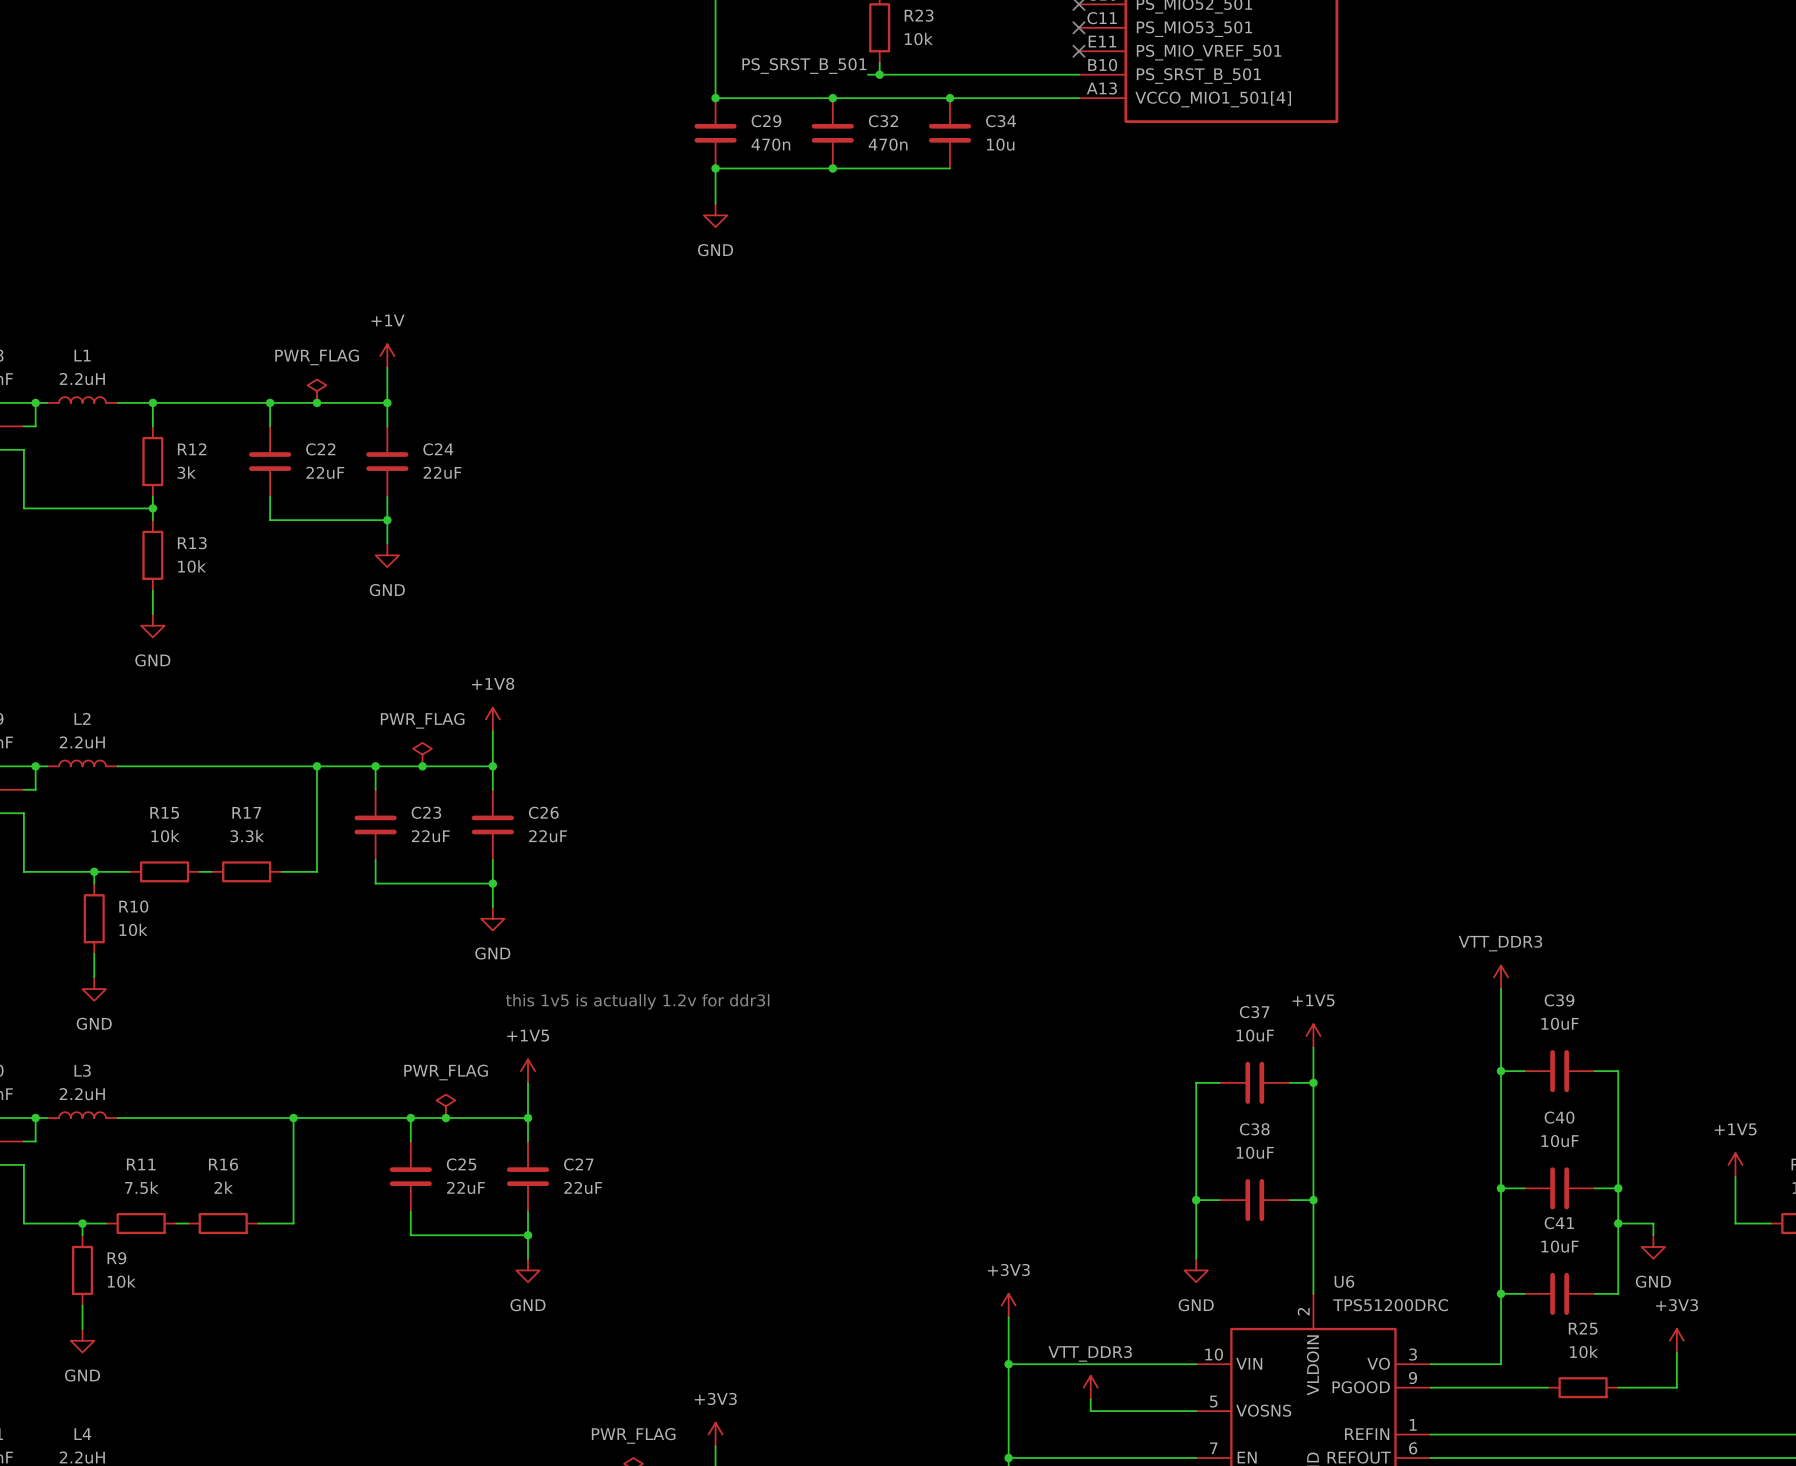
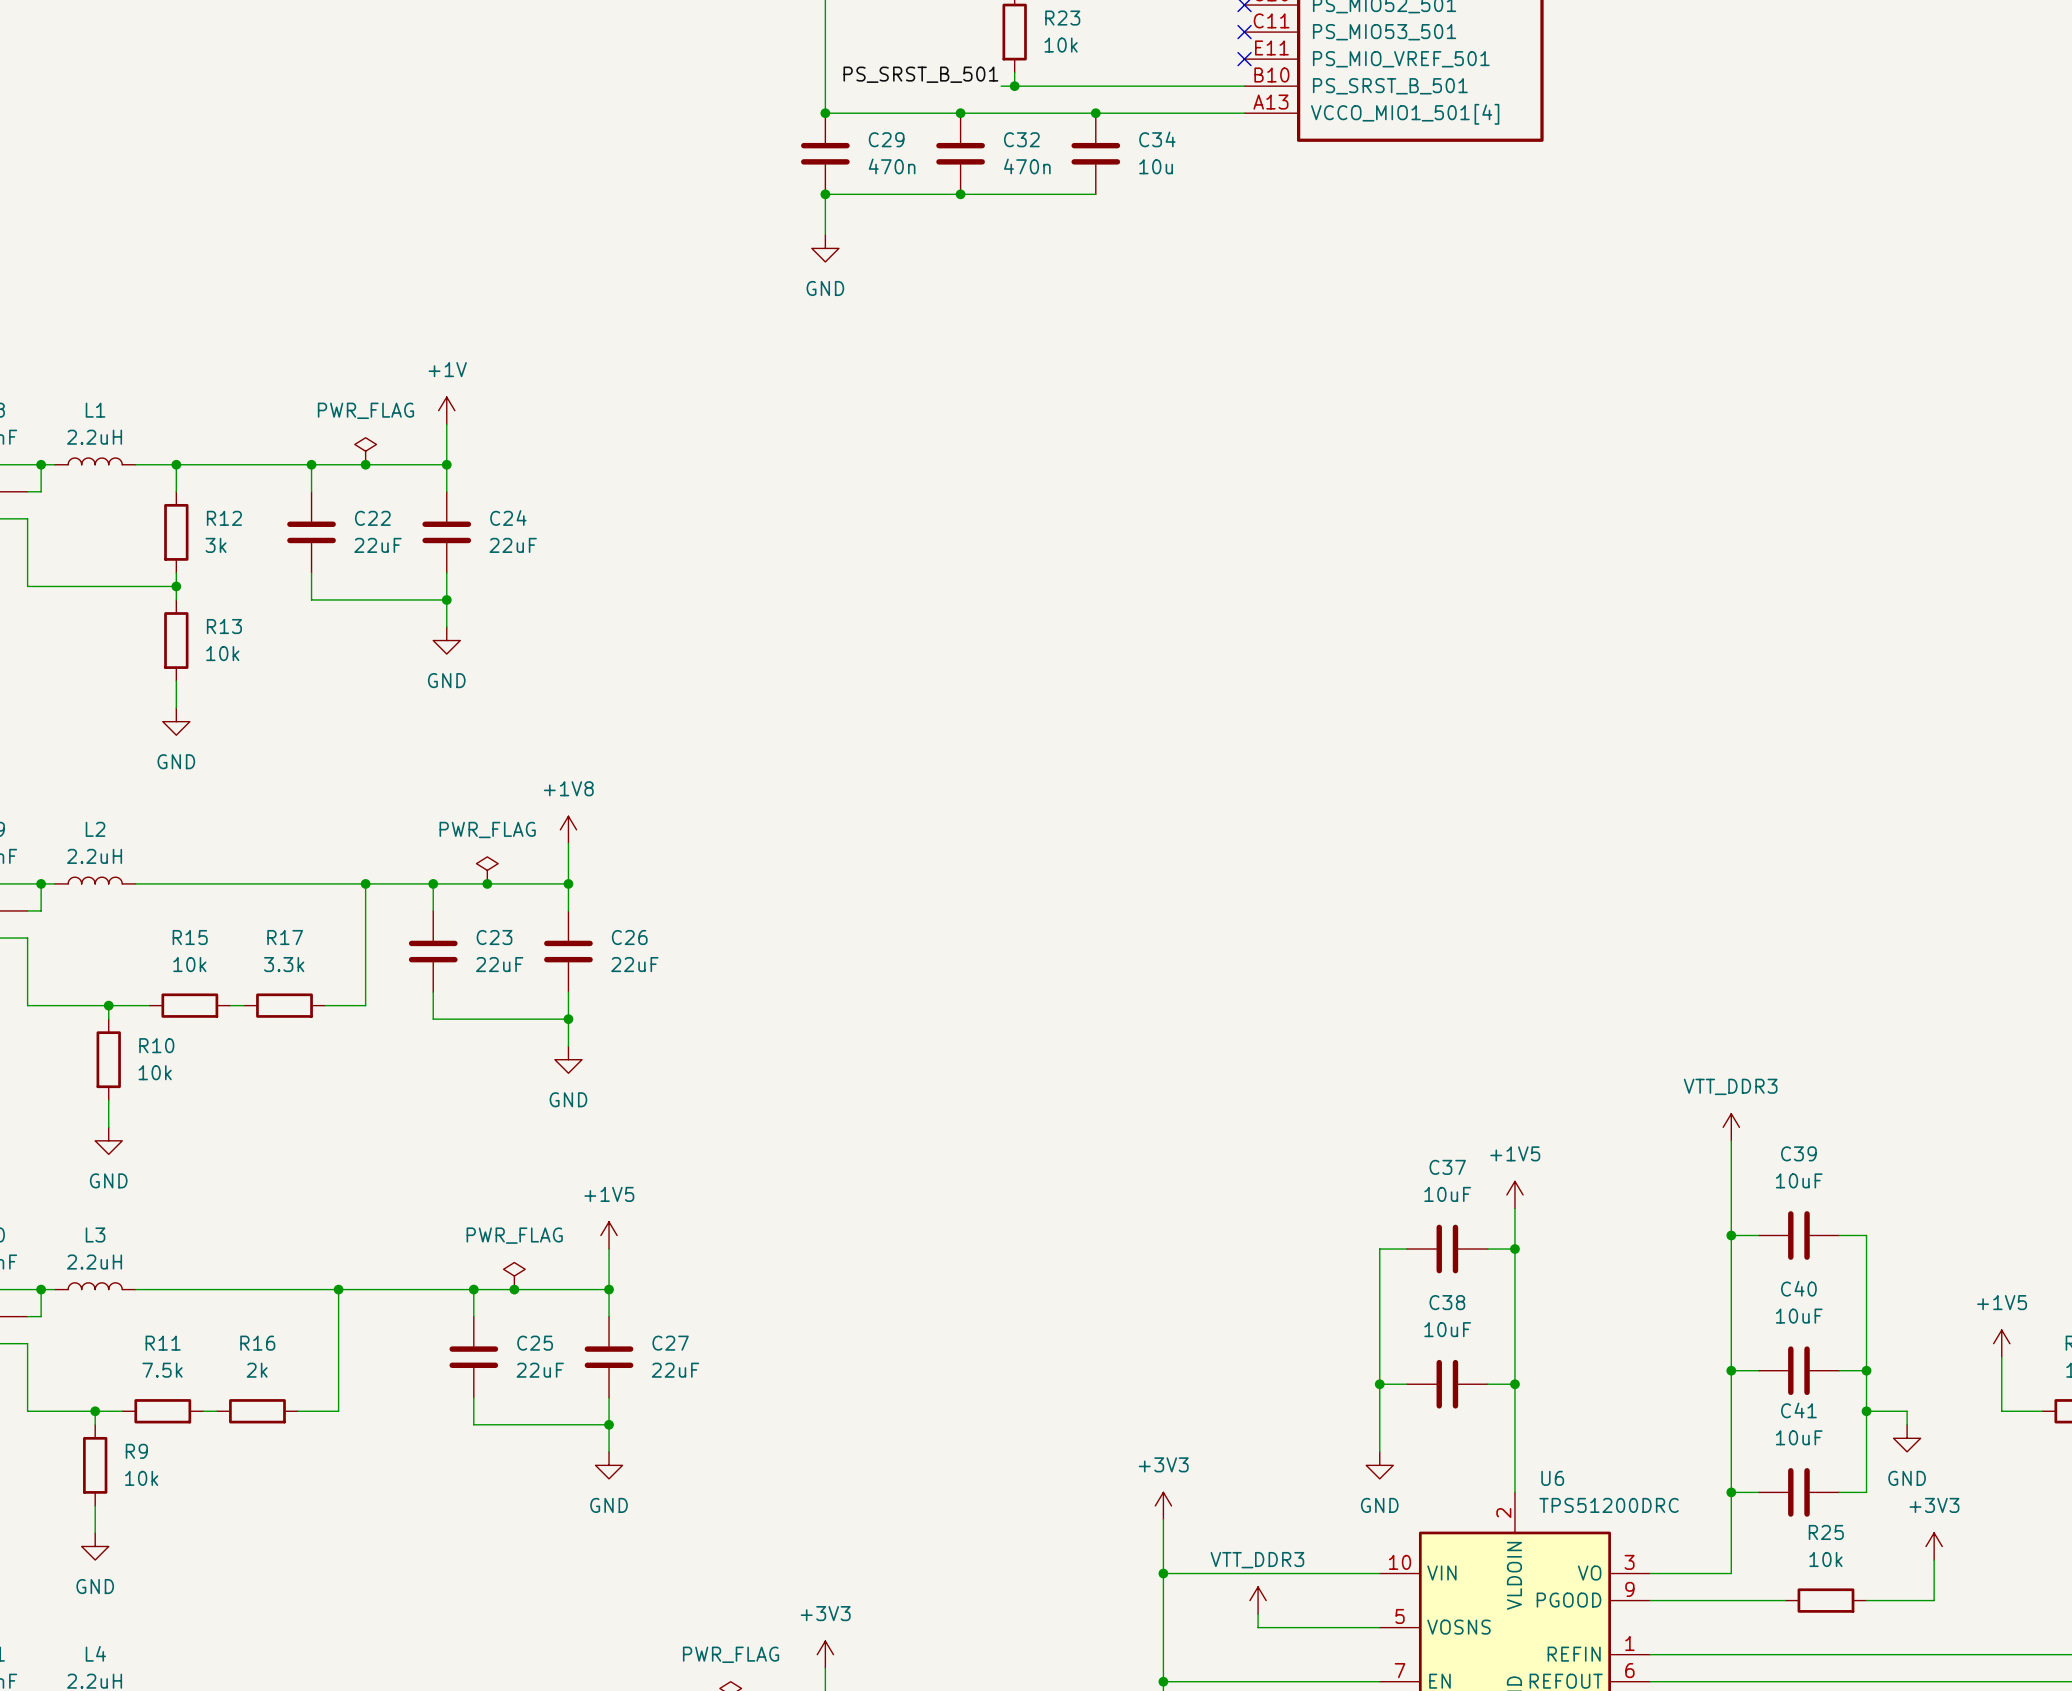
text: this 1v5 is actually 1.2v for ddr3l (637, 1001) -> none

